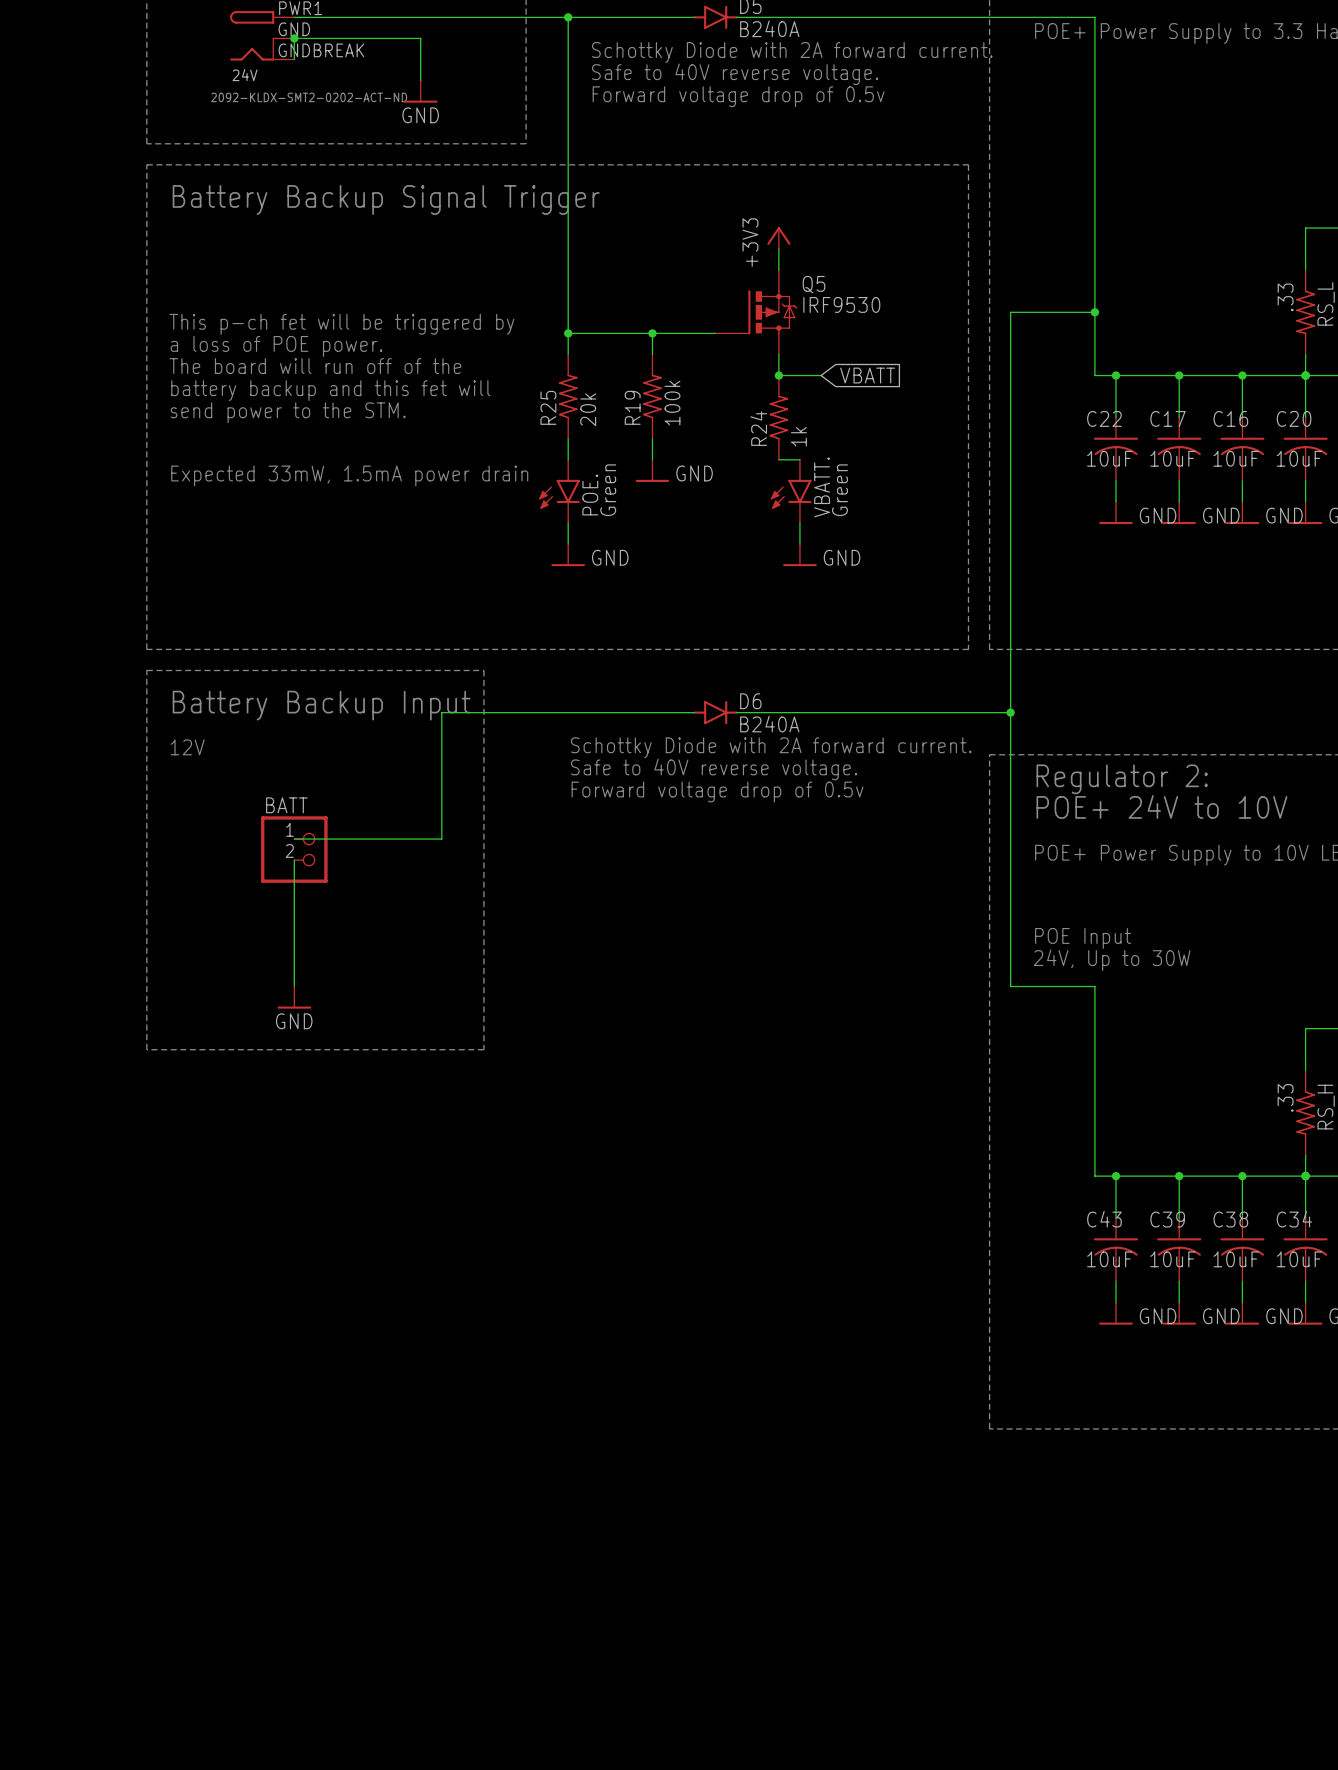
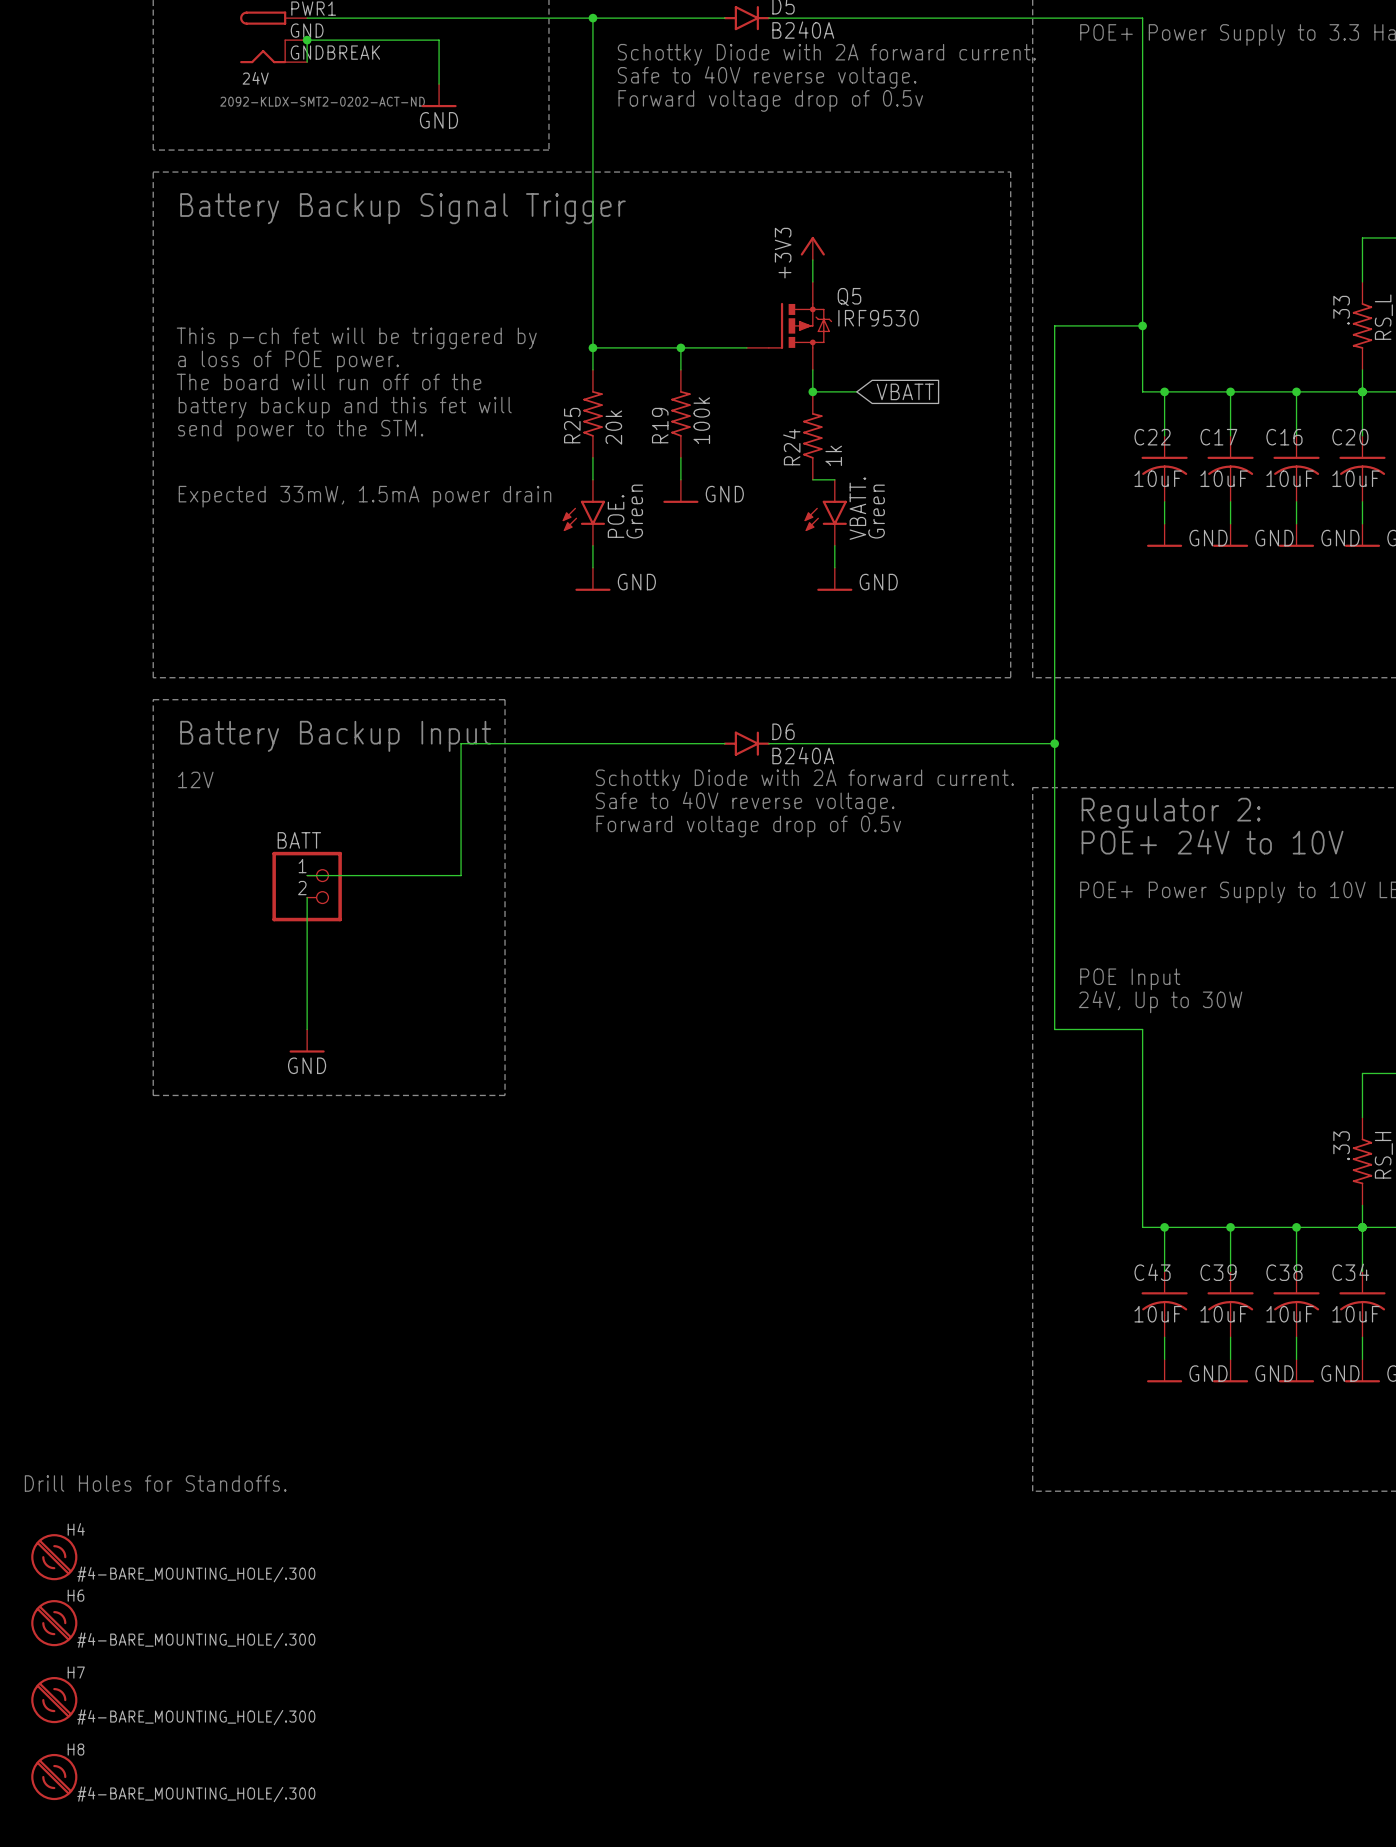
text: none -> Drill Holes for Standoffs. (155, 1483)
H4: none -> #4-BARE_MOUNTING_HOLE/.300 (54, 1557)
H6: none -> #4-BARE_MOUNTING_HOLE/.300 (54, 1623)
H7: none -> #4-BARE_MOUNTING_HOLE/.300 (54, 1700)
H8: none -> #4-BARE_MOUNTING_HOLE/.300 (54, 1777)

